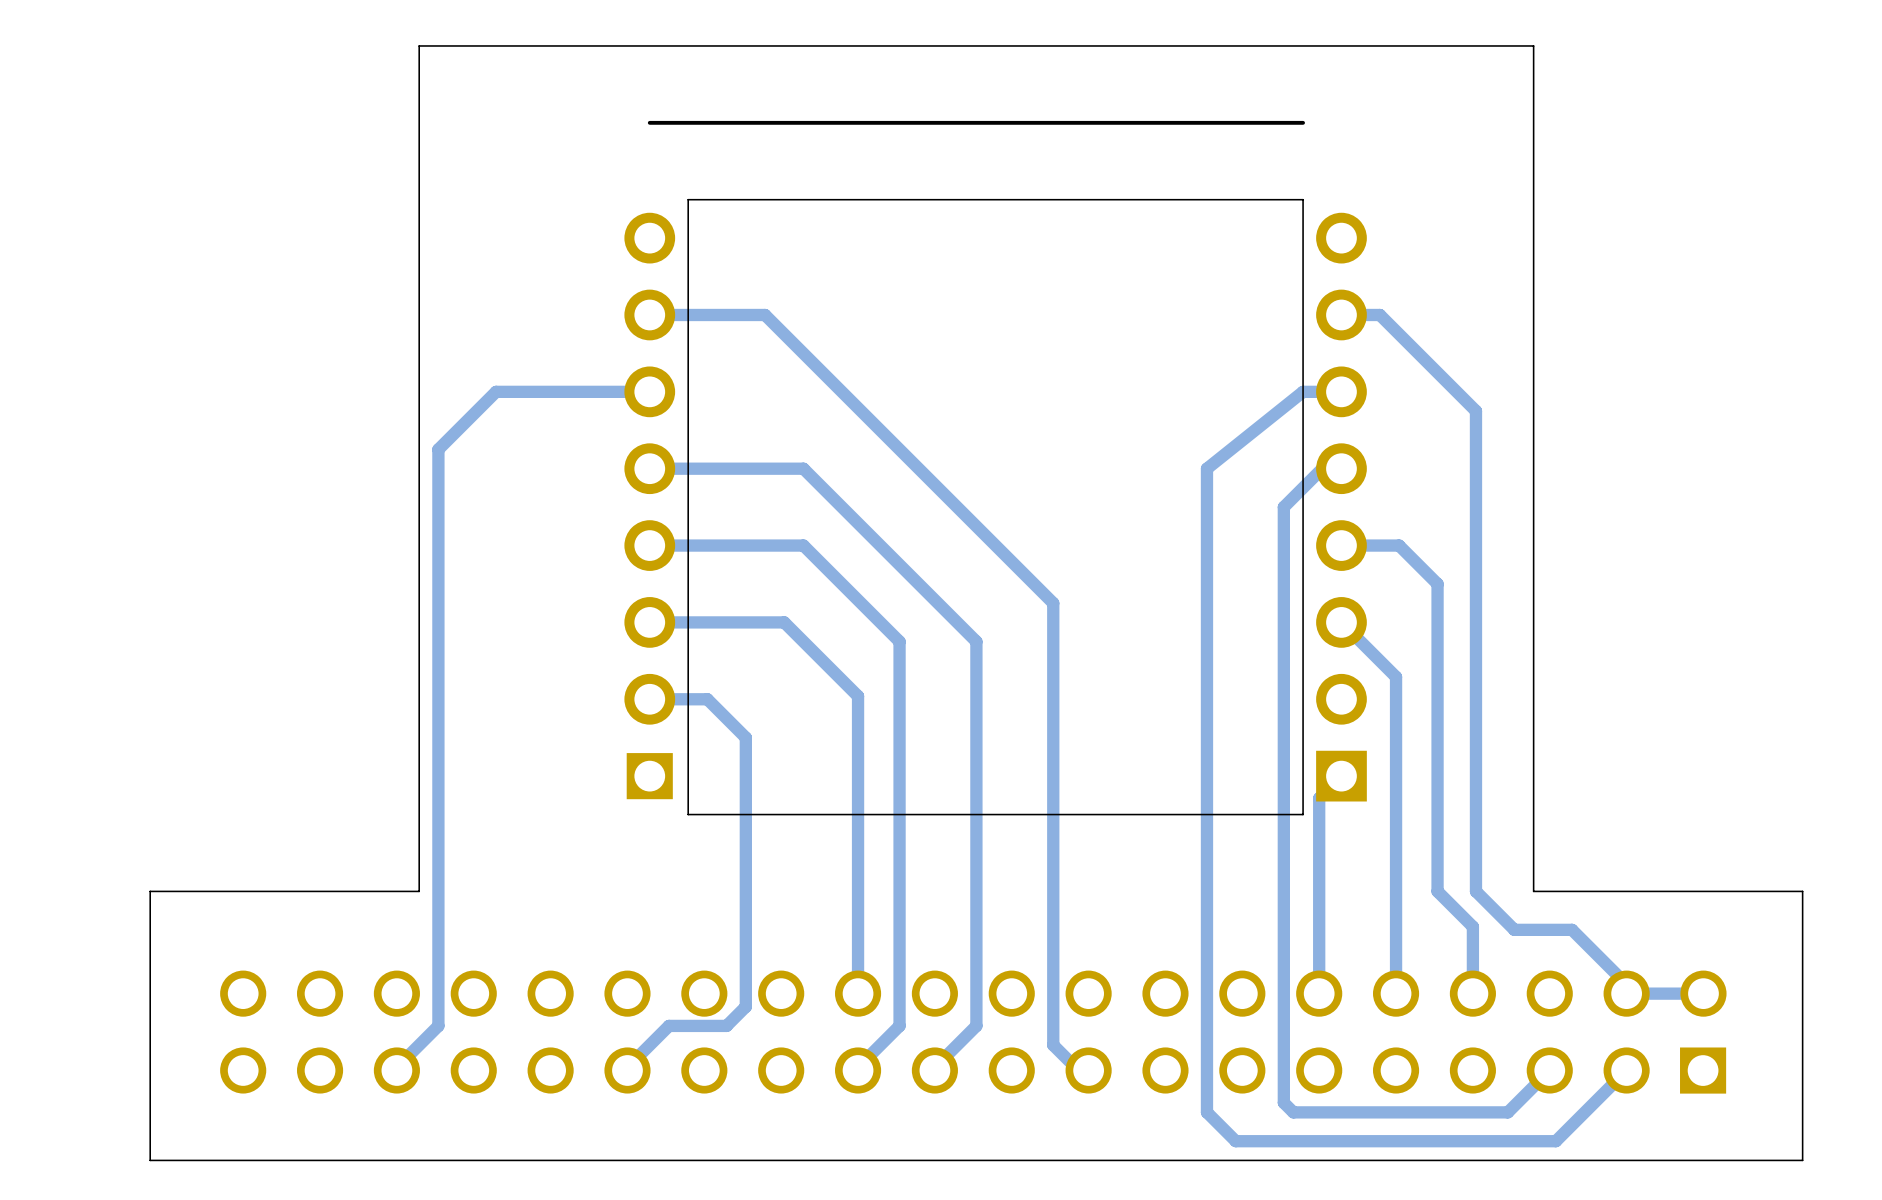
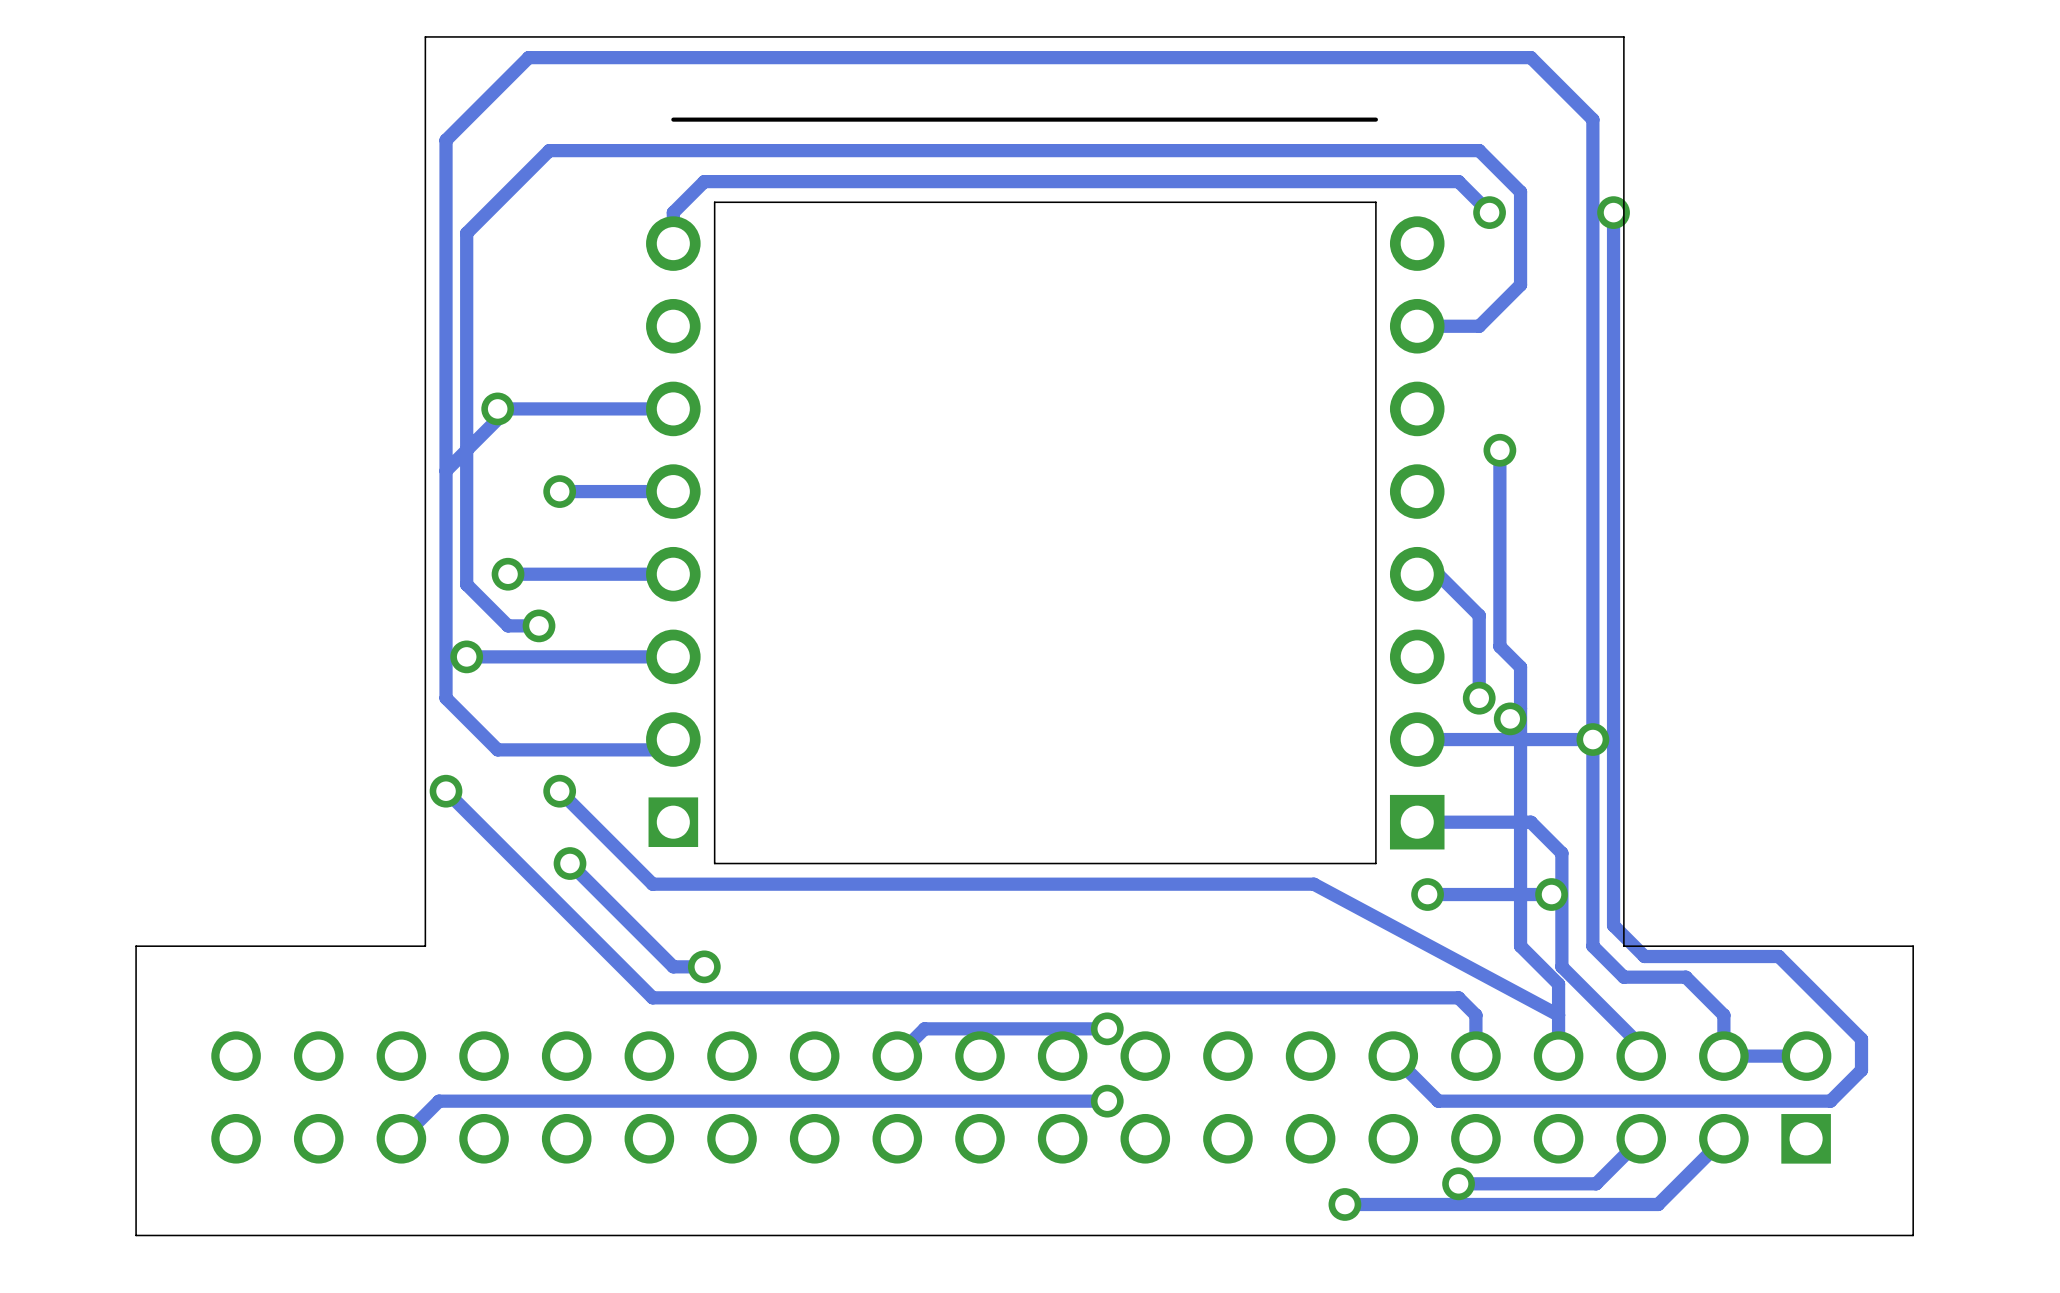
track: none -> (1489, 212) (1458, 181) (704, 181) (673, 212) (673, 243)
via: none -> (1489, 212)
track: none -> (1613, 212) (1613, 925) (1644, 956) (1778, 956) (1861, 1039) (1861, 1070) (1830, 1101) (1438, 1101) (1393, 1056)
via: none -> (1613, 212)
track: (649, 314) (765, 314) (1053, 603) (1053, 1045) (1078, 1070) (1088, 1070) -> none
track: (1379, 314) (1475, 411) (1475, 891) (1514, 929) (1572, 929) (1626, 984) -> (446, 470) (446, 140) (528, 57) (1530, 57) (1592, 119) (1592, 946) (1623, 977) (1685, 977) (1723, 1015) (1723, 1046)
track: none -> (1458, 326) (1479, 326) (1520, 284) (1520, 191) (1479, 150) (549, 150) (466, 233) (466, 584) (508, 625) (539, 625)
via: none -> (497, 408)
track: (1341, 391) (1303, 391) (1206, 468) (1206, 1112) (1235, 1141) (1555, 1141) (1565, 1131) -> (1344, 1204) (1658, 1204)
track: none -> (1499, 450) (1499, 646) (1520, 667)
via: none -> (1499, 450)
via: none -> (559, 491)
track: (649, 468) (803, 468) (976, 641) (976, 1025) (941, 1061) (934, 1061) (934, 1070) -> (673, 491) (559, 491)
track: (1341, 468) (1322, 468) (1283, 507) (1283, 1102) (1293, 1112) (1379, 1112) -> none
via: none -> (508, 574)
track: (649, 545) (803, 545) (899, 641) (899, 1025) (858, 1067) (858, 1070) -> (673, 574) (508, 574)
track: (1360, 545) (1399, 545) (1437, 583) (1437, 632) -> (1437, 574) (1479, 615) (1479, 698)
via: none -> (539, 625)
via: none -> (466, 656)
track: (649, 622) (784, 622) (858, 696) (858, 993) -> (1107, 1028) (924, 1028) (897, 1056)
track: none -> (673, 656) (466, 656)
track: (1341, 622) (1396, 676) (1396, 955) -> (446, 791) (652, 997) (1458, 997) (1475, 1015)
track: (438, 660) (438, 1025) (396, 1067) (396, 1070) -> (446, 698) (497, 749) (662, 749) (673, 739)
via: none -> (1479, 698)
via: none -> (1510, 718)
track: (649, 699) (707, 699) (745, 737) (745, 1006) (726, 1025) (668, 1025) (627, 1067) (627, 1070) -> none
track: none -> (1592, 739) (1417, 739)
via: none -> (1592, 739)
via: none -> (446, 791)
track: none -> (559, 791) (652, 884) (1313, 884) (1558, 1015)
via: none -> (559, 791)
track: (1341, 776) (1319, 798) (1319, 993) -> (1417, 822) (1530, 822) (1561, 853) (1561, 966) (1641, 1046) (1641, 1056)
track: none -> (570, 863) (673, 966) (704, 966)
via: none -> (570, 863)
via: none -> (1427, 894)
track: none -> (1551, 894) (1427, 894)
via: none -> (1551, 894)
via: none -> (704, 966)
via: none -> (1107, 1028)
track: none -> (1107, 1101) (439, 1101) (401, 1138)
via: none -> (1107, 1101)
via: none -> (1458, 1183)
via: none -> (1344, 1204)

